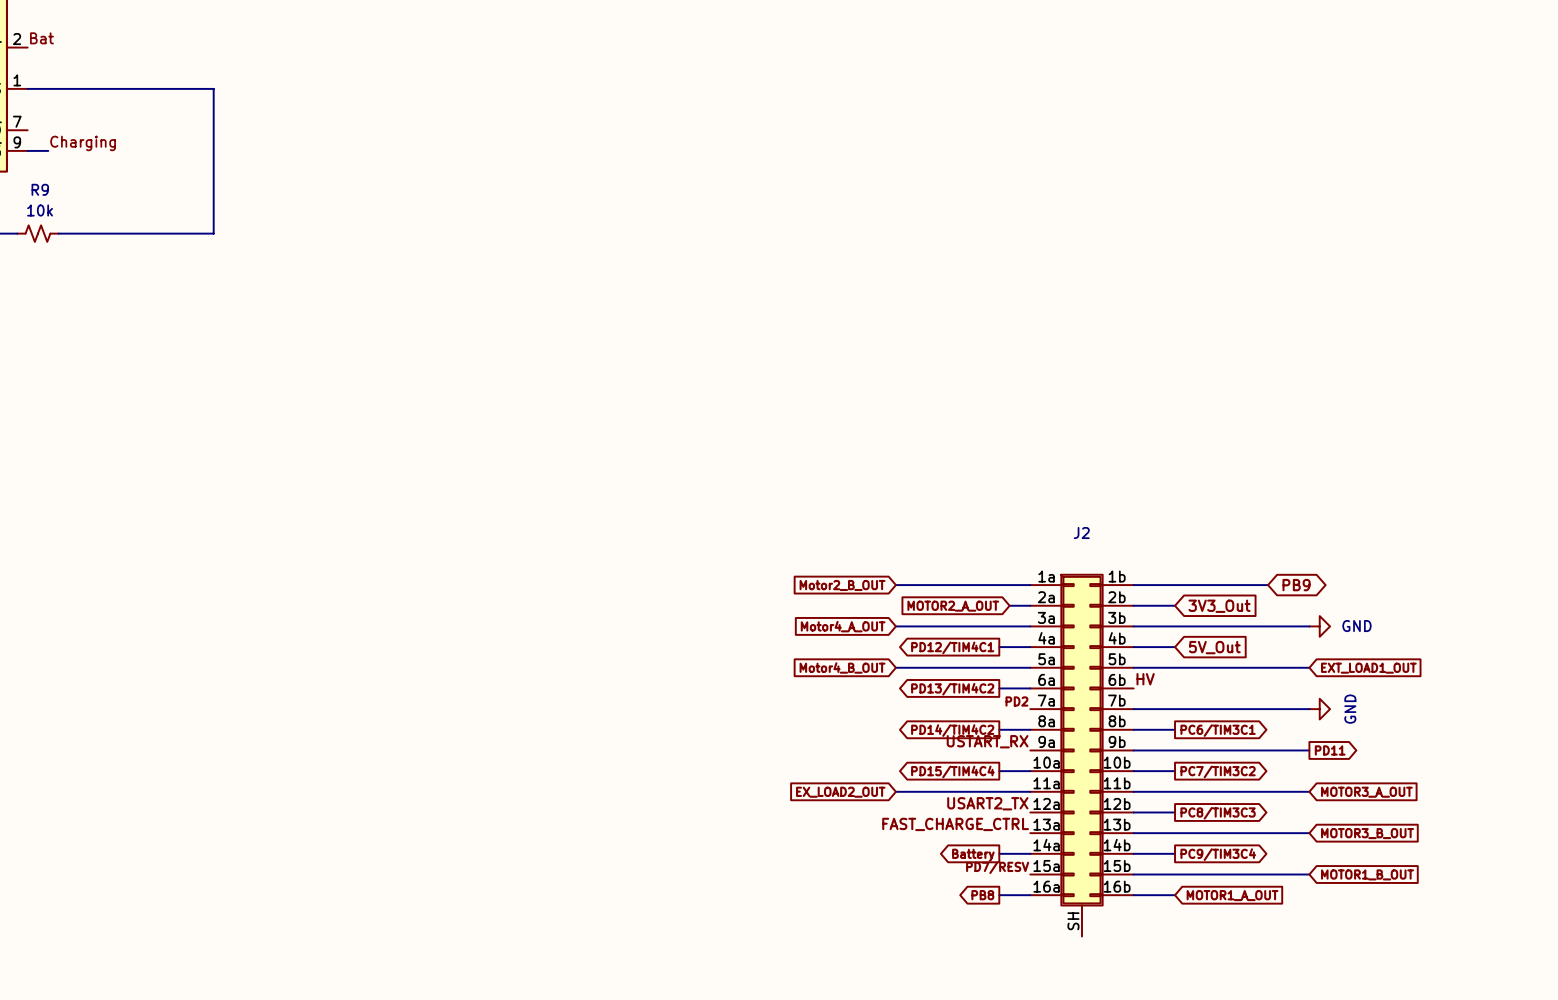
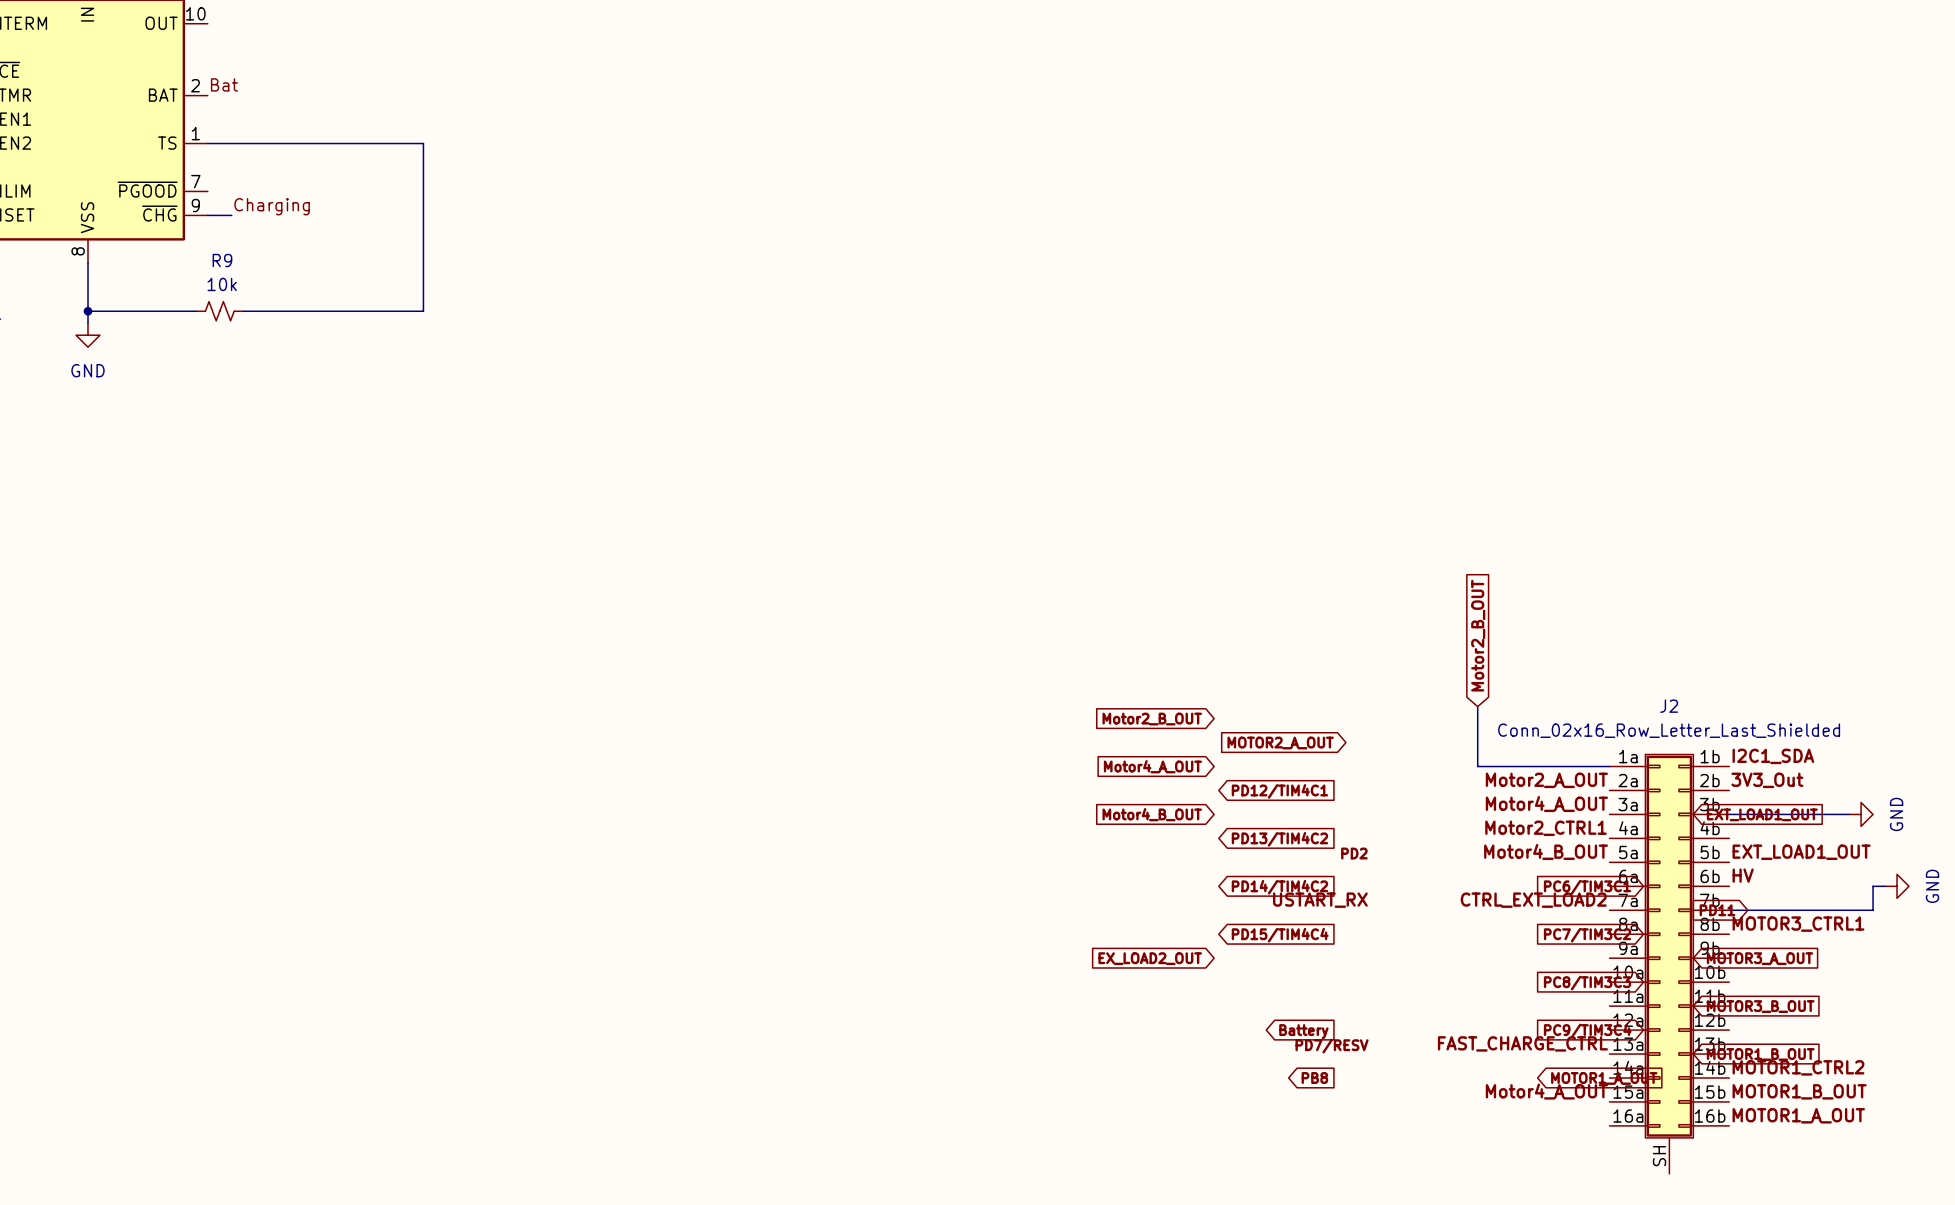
global label: none -> Motor2_B_OUT (1478, 635)
wire: none -> (1477, 706) (1477, 766) (1489, 766)
wire: (895, 585) (1030, 585) -> none
wire: (1133, 585) (1268, 585) -> none
global label: PB9 (1296, 585) -> none
J2 value: none -> Conn_02x16_Row_Letter_Last_Shielded (1669, 730)
wire: (1009, 605) (1030, 605) -> none
wire: (1133, 605) (1175, 605) -> none
global label: 3V3_Out (1219, 606) -> none
label: none -> I2C1_SDA (1773, 756)
wire: (895, 626) (1030, 626) -> none
power symbol: GND (1319, 626) -> none
label: none -> Motor2_A_OUT (1546, 780)
label: none -> 3V3_Out (1767, 780)
wire: (999, 647) (1030, 647) -> none
wire: (1133, 647) (1175, 647) -> none
global label: 5V_Out (1214, 647) -> none
label: none -> Motor4_A_OUT (1546, 804)
wire: (895, 667) (1030, 667) -> none
wire: (1133, 667) (1309, 667) -> none
wire: none -> (1729, 814) (1849, 814)
power symbol: none -> GND (1861, 814)
label: HV (1145, 679) -> none
label: none -> Motor2_CTRL1 (1546, 828)
wire: (999, 688) (1030, 688) -> none
label: none -> Motor4_B_OUT (1546, 851)
label: none -> EXT_LOAD1_OUT (1801, 852)
wire: (1133, 709) (1309, 709) -> none
power symbol: GND (1319, 709) -> none
label: none -> HV (1743, 875)
wire: (999, 729) (1030, 729) -> none
wire: (1133, 729) (1175, 729) -> none
wire: none -> (1885, 886) (1873, 886) (1873, 910) (1729, 910)
power symbol: none -> GND (1897, 886)
label: none -> CTRL_EXT_LOAD2 (1533, 900)
wire: (1133, 750) (1309, 750) -> none
J2 position: (1081, 755) -> (1669, 963)
label: none -> MOTOR3_CTRL1 (1798, 924)
wire: (999, 771) (1030, 771) -> none
wire: (1133, 771) (1175, 771) -> none
wire: (895, 791) (1030, 791) -> none
wire: (1133, 791) (1309, 791) -> none
label: USART2_TX (987, 803) -> none
wire: (1133, 812) (1175, 812) -> none
label: FAST_CHARGE_CTRL (955, 824) -> none
wire: (1133, 833) (1309, 833) -> none
wire: (999, 853) (1030, 853) -> none
wire: (1133, 853) (1175, 853) -> none
label: none -> FAST_CHARGE_CTRL (1522, 1043)
wire: (1133, 874) (1309, 874) -> none
label: none -> MOTOR1_CTRL2 (1798, 1067)
wire: (999, 895) (1030, 895) -> none
wire: (1133, 895) (1175, 895) -> none
label: none -> Motor4_A_OUT (1546, 1091)
label: none -> MOTOR1_B_OUT (1799, 1091)
label: none -> MOTOR1_A_OUT (1798, 1115)

